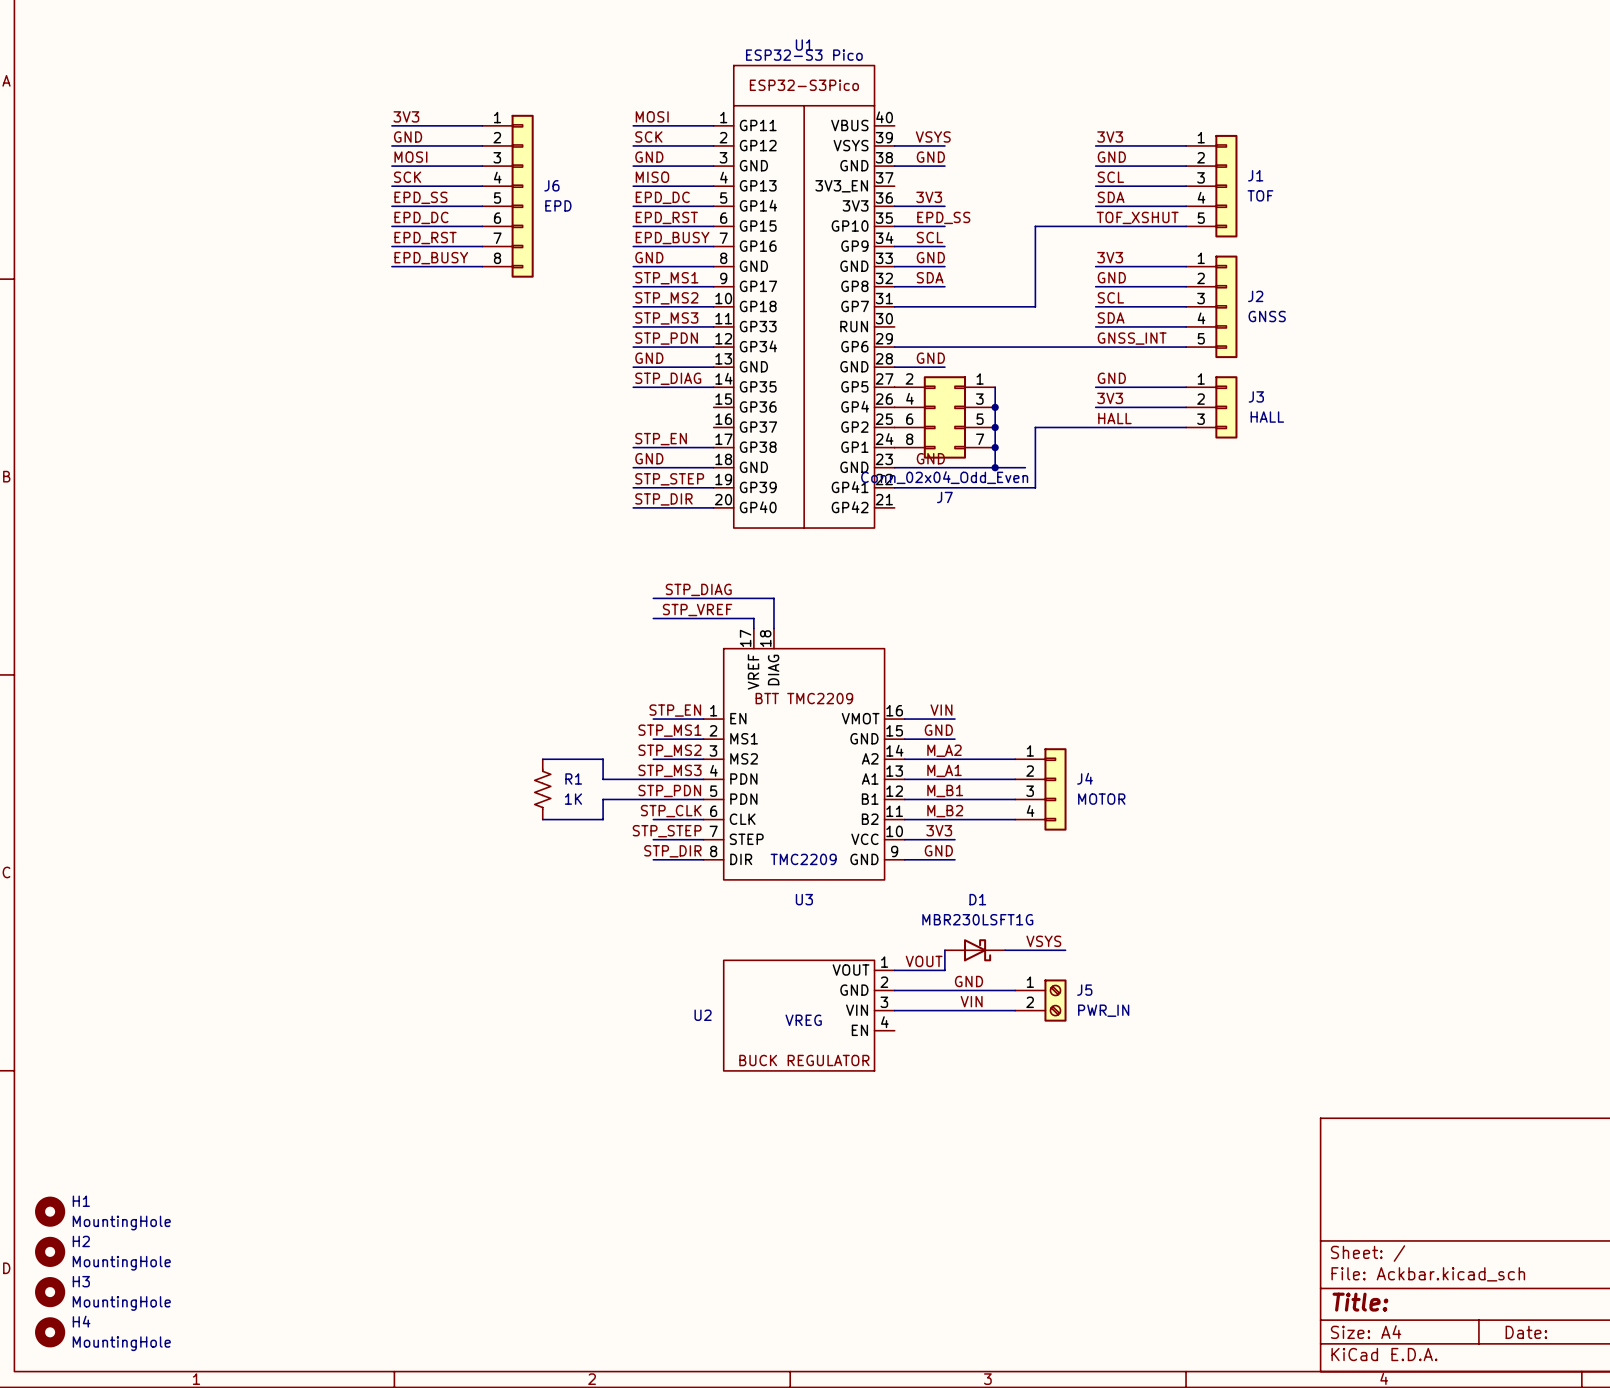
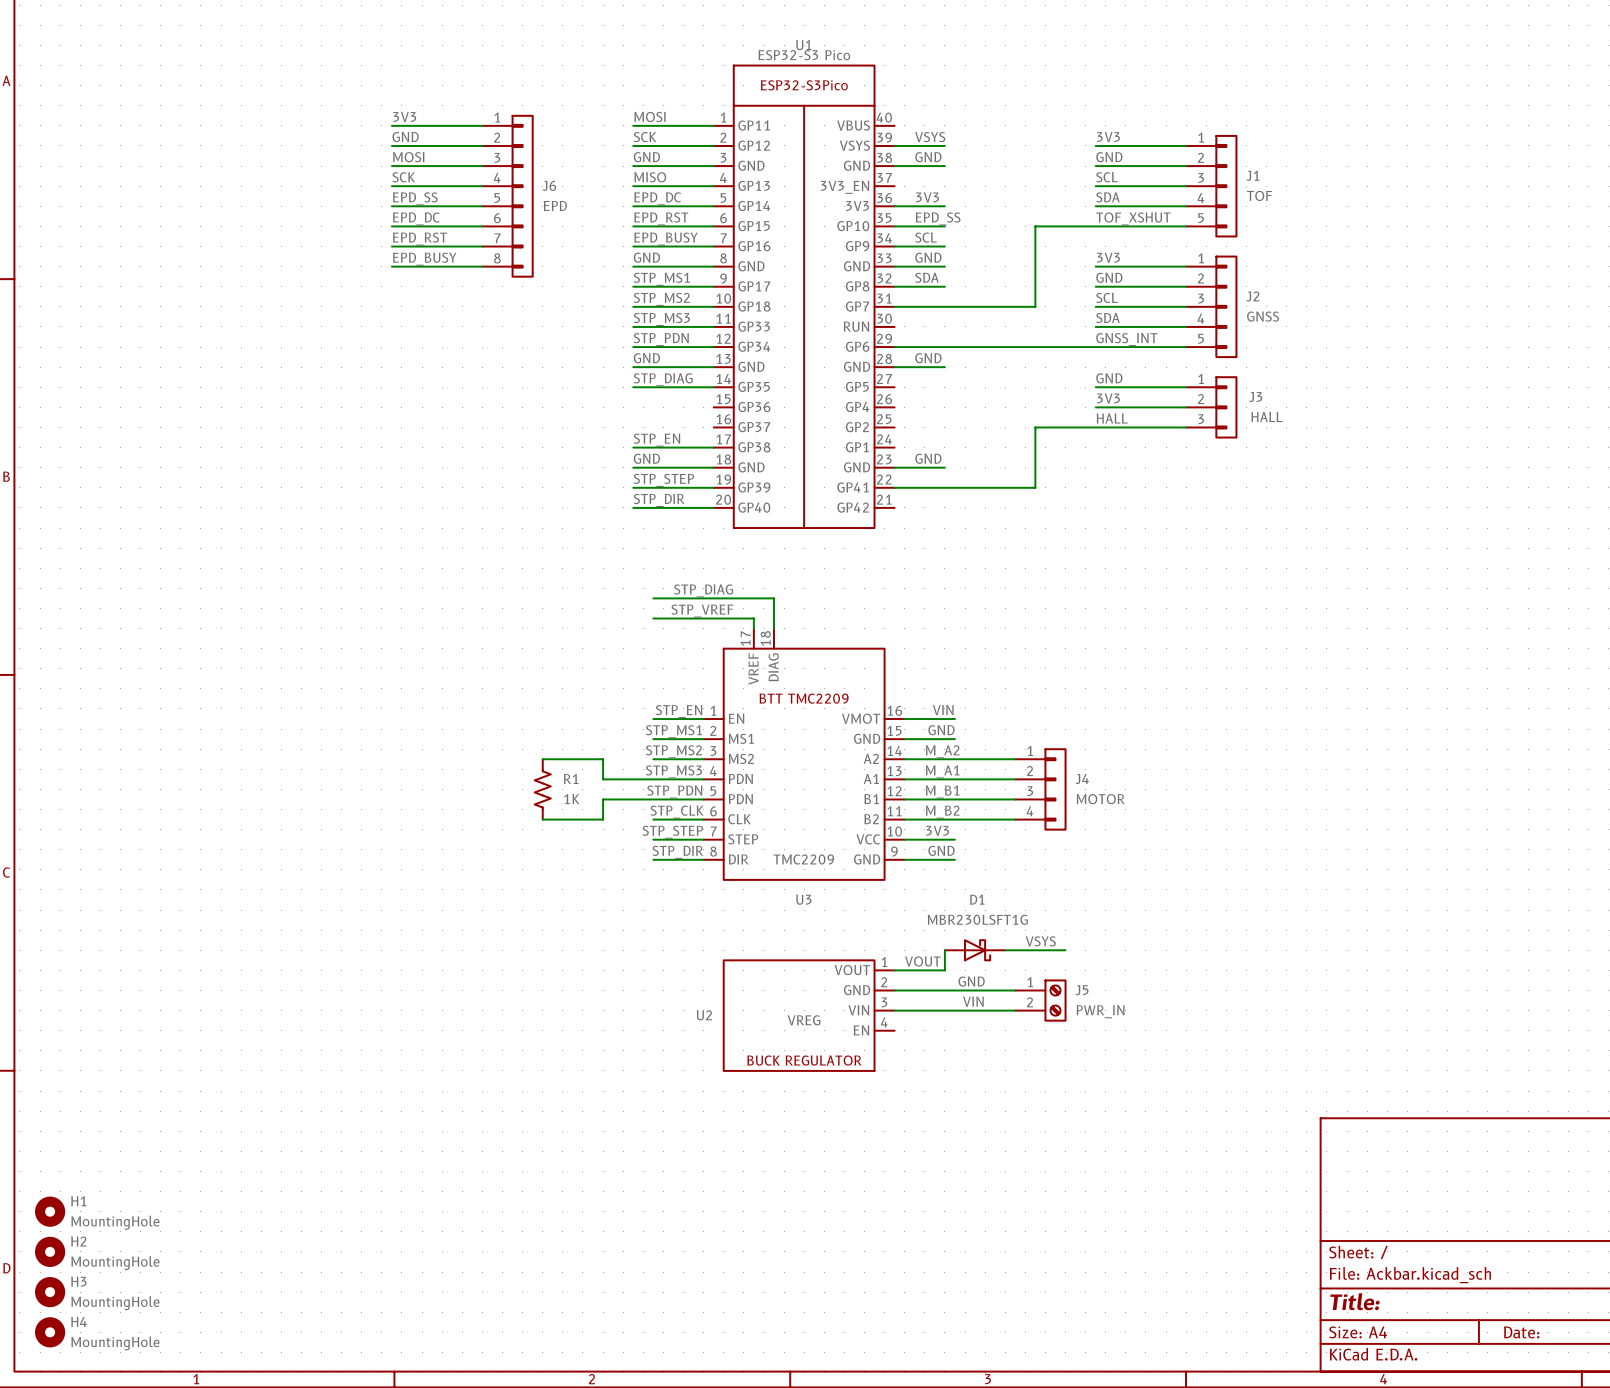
wire: (995, 387) (995, 467) -> none
junction: (995, 407) -> none
J7: Conn_02x04_Odd_Even (944, 417) -> none
junction: (995, 427) -> none
junction: (995, 447) -> none
wire: (944, 467) (1025, 467) -> none
junction: (995, 467) -> none

